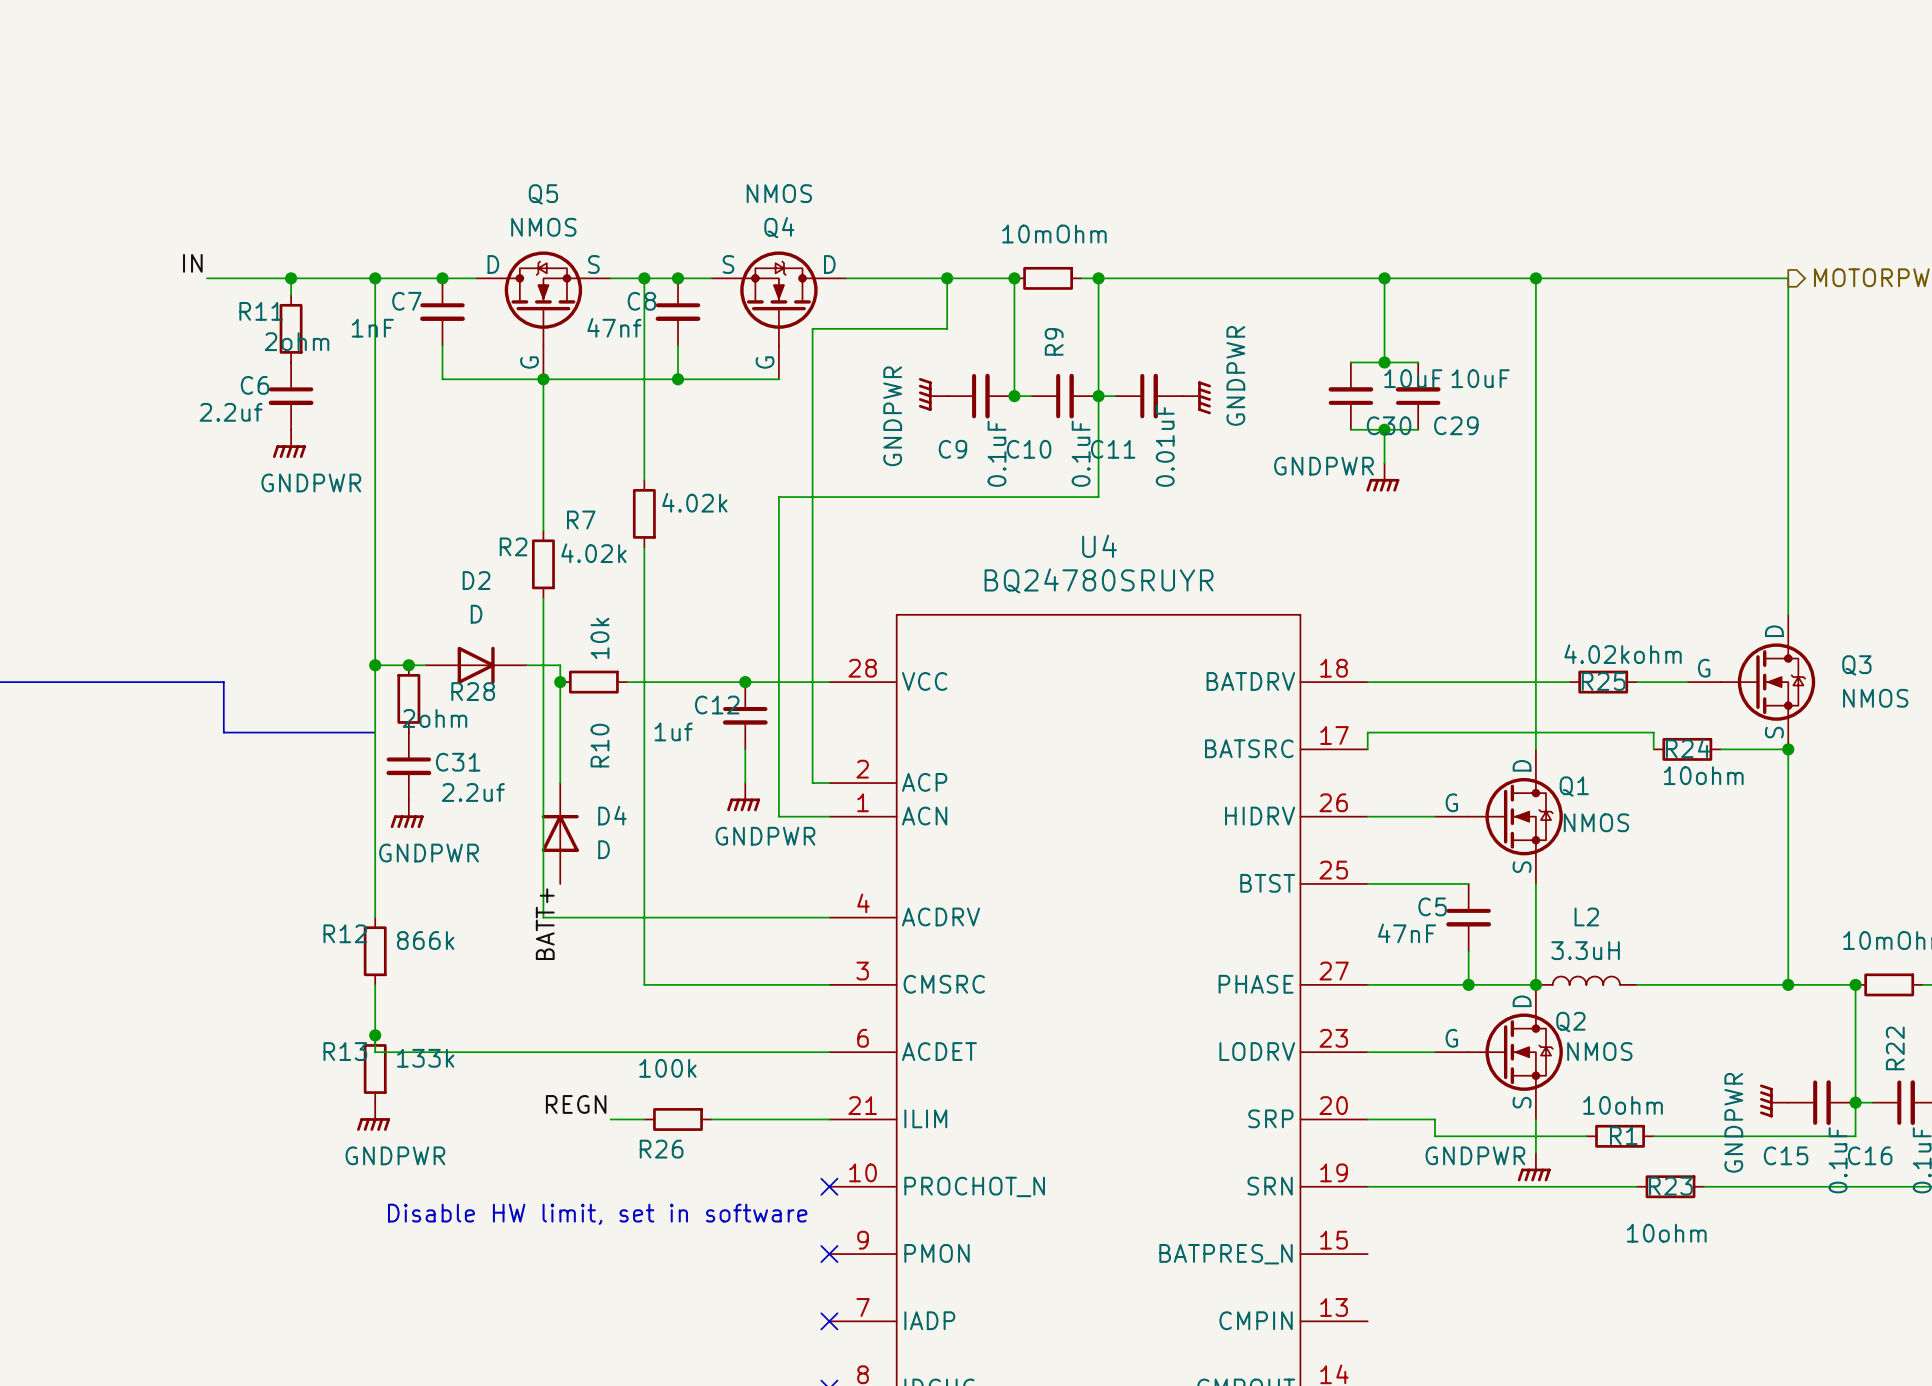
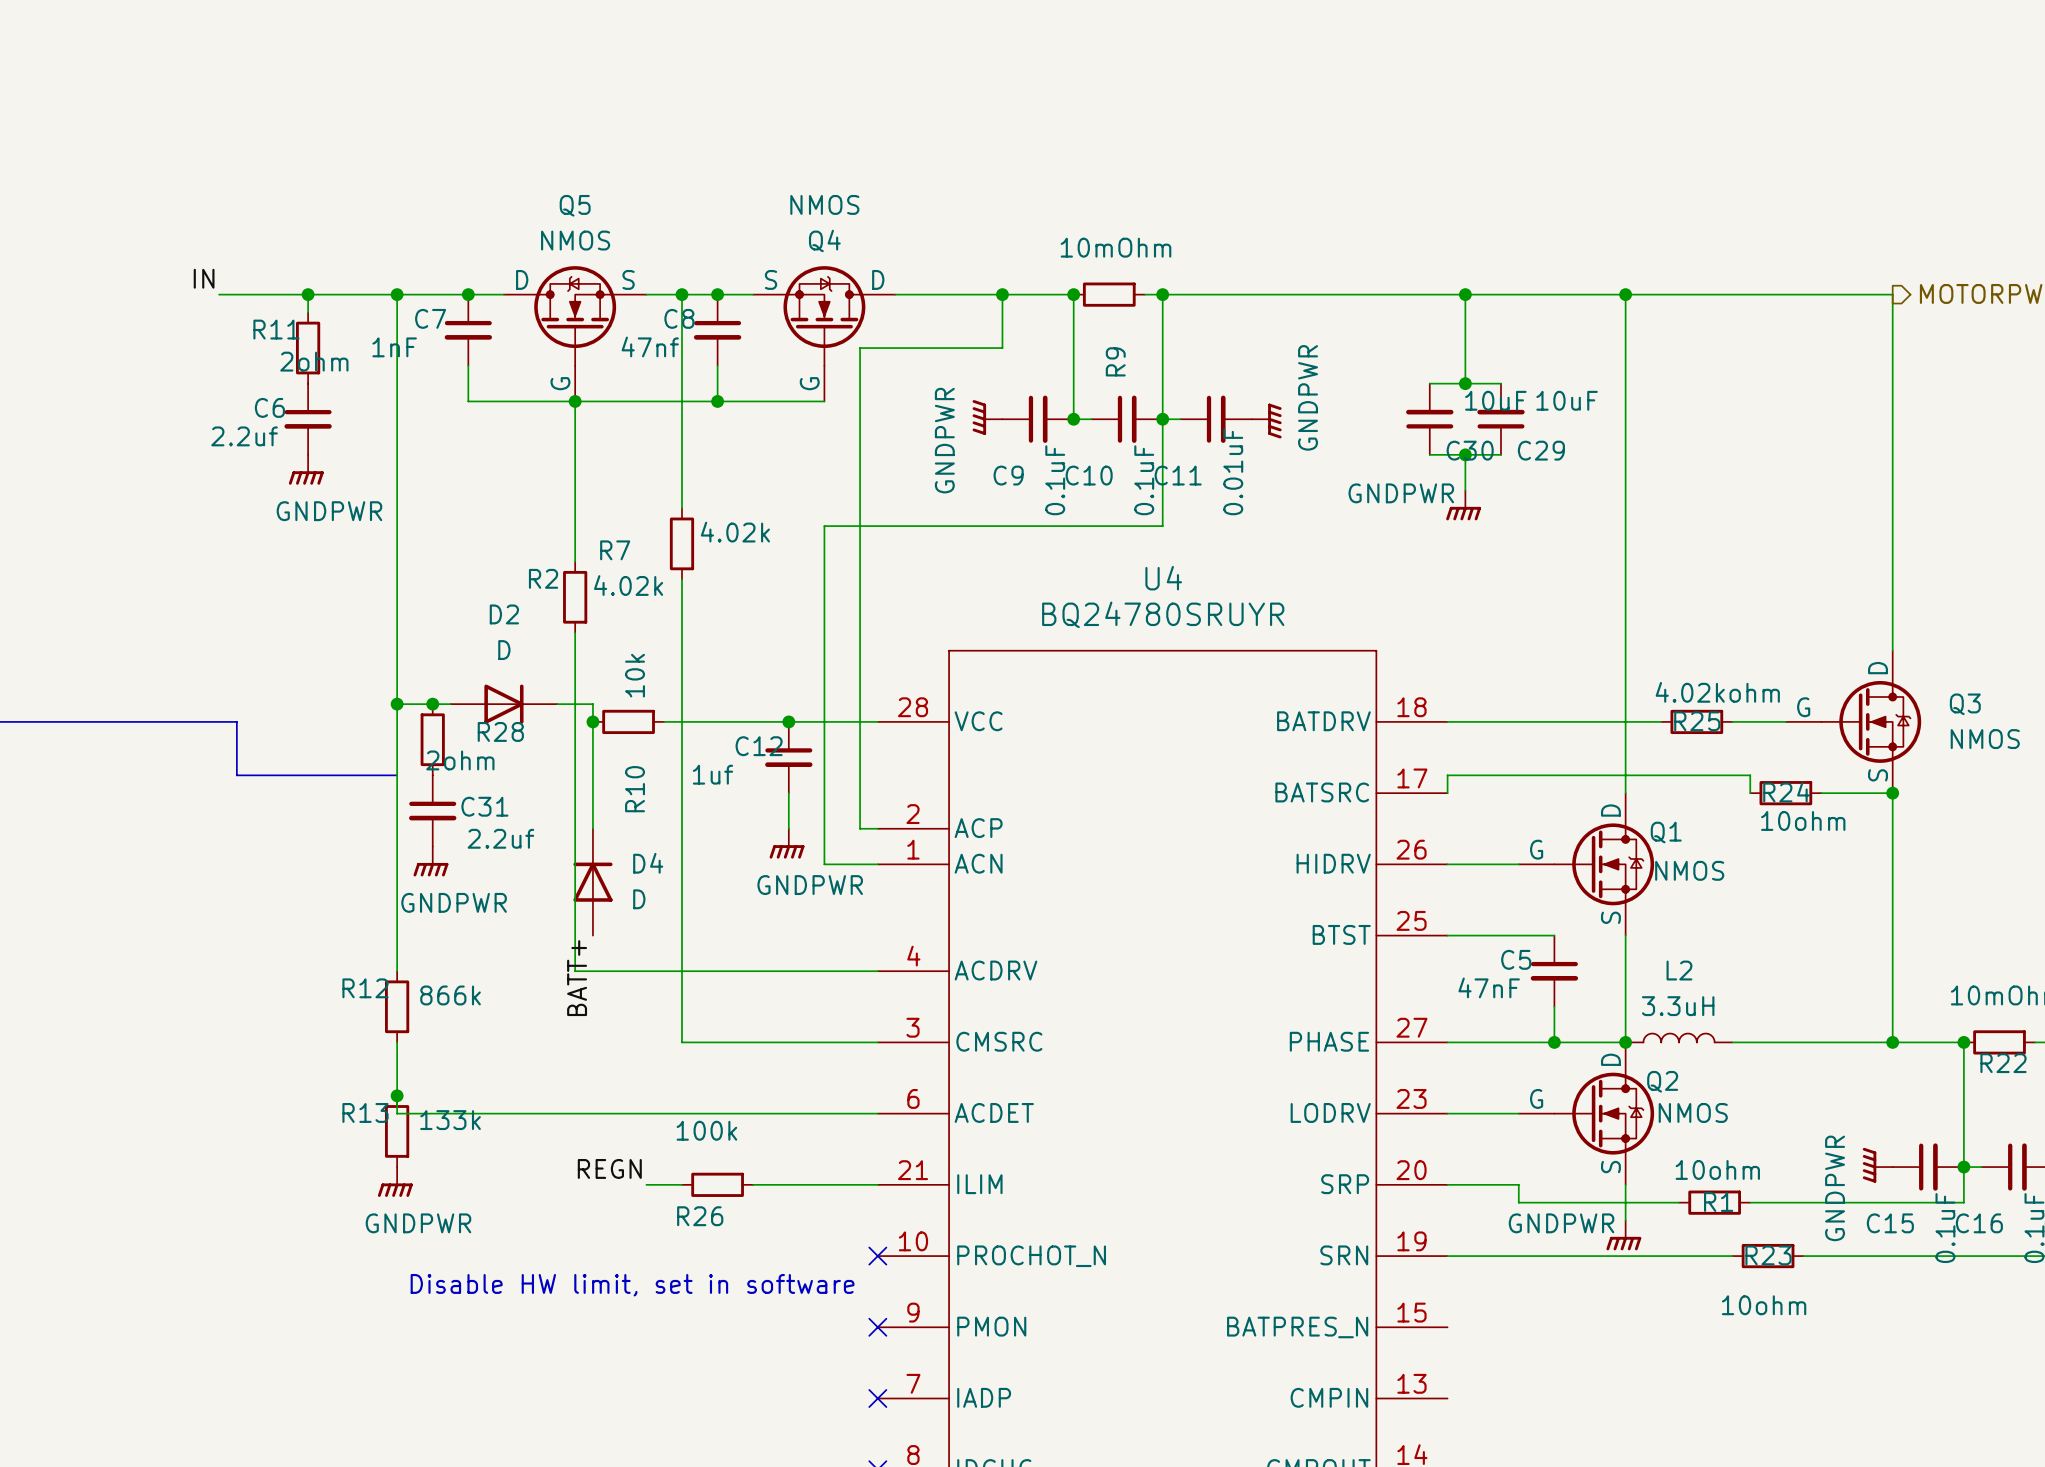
R22 name rotation: 0° (1895, 1048) -> 90° clockwise (2003, 1063)

